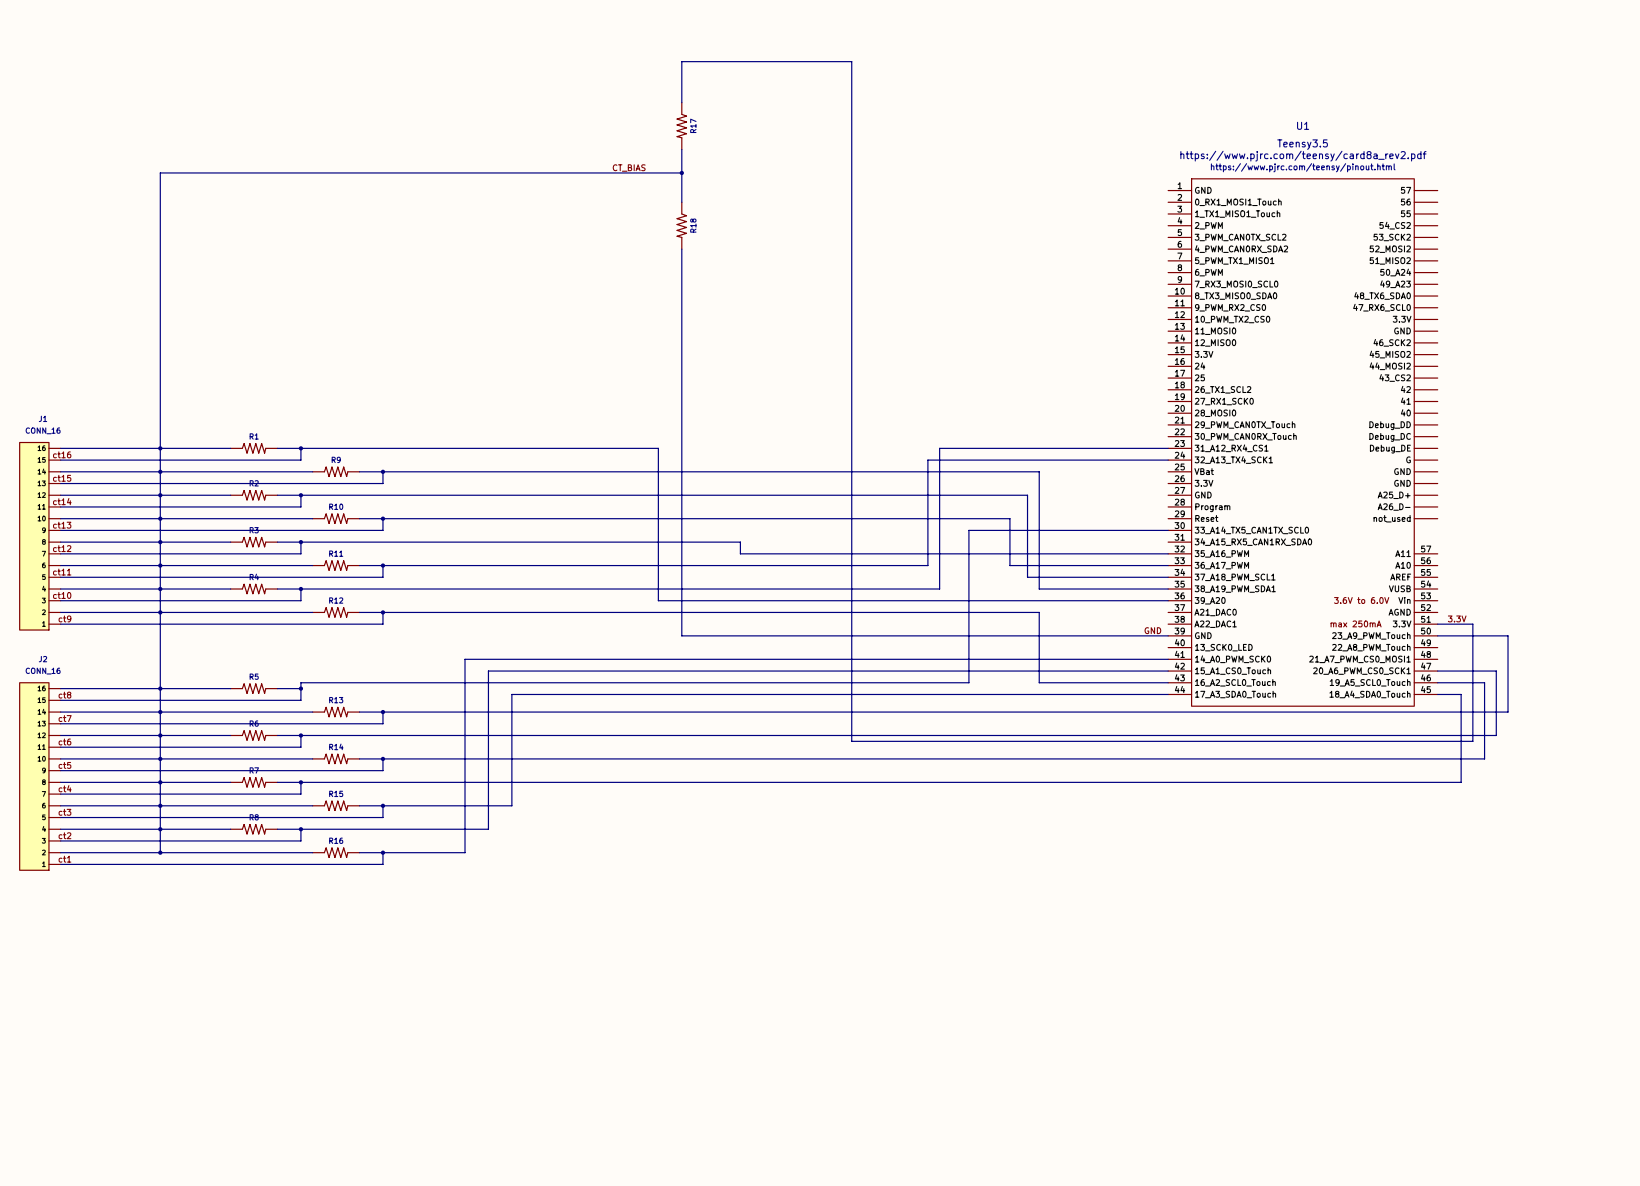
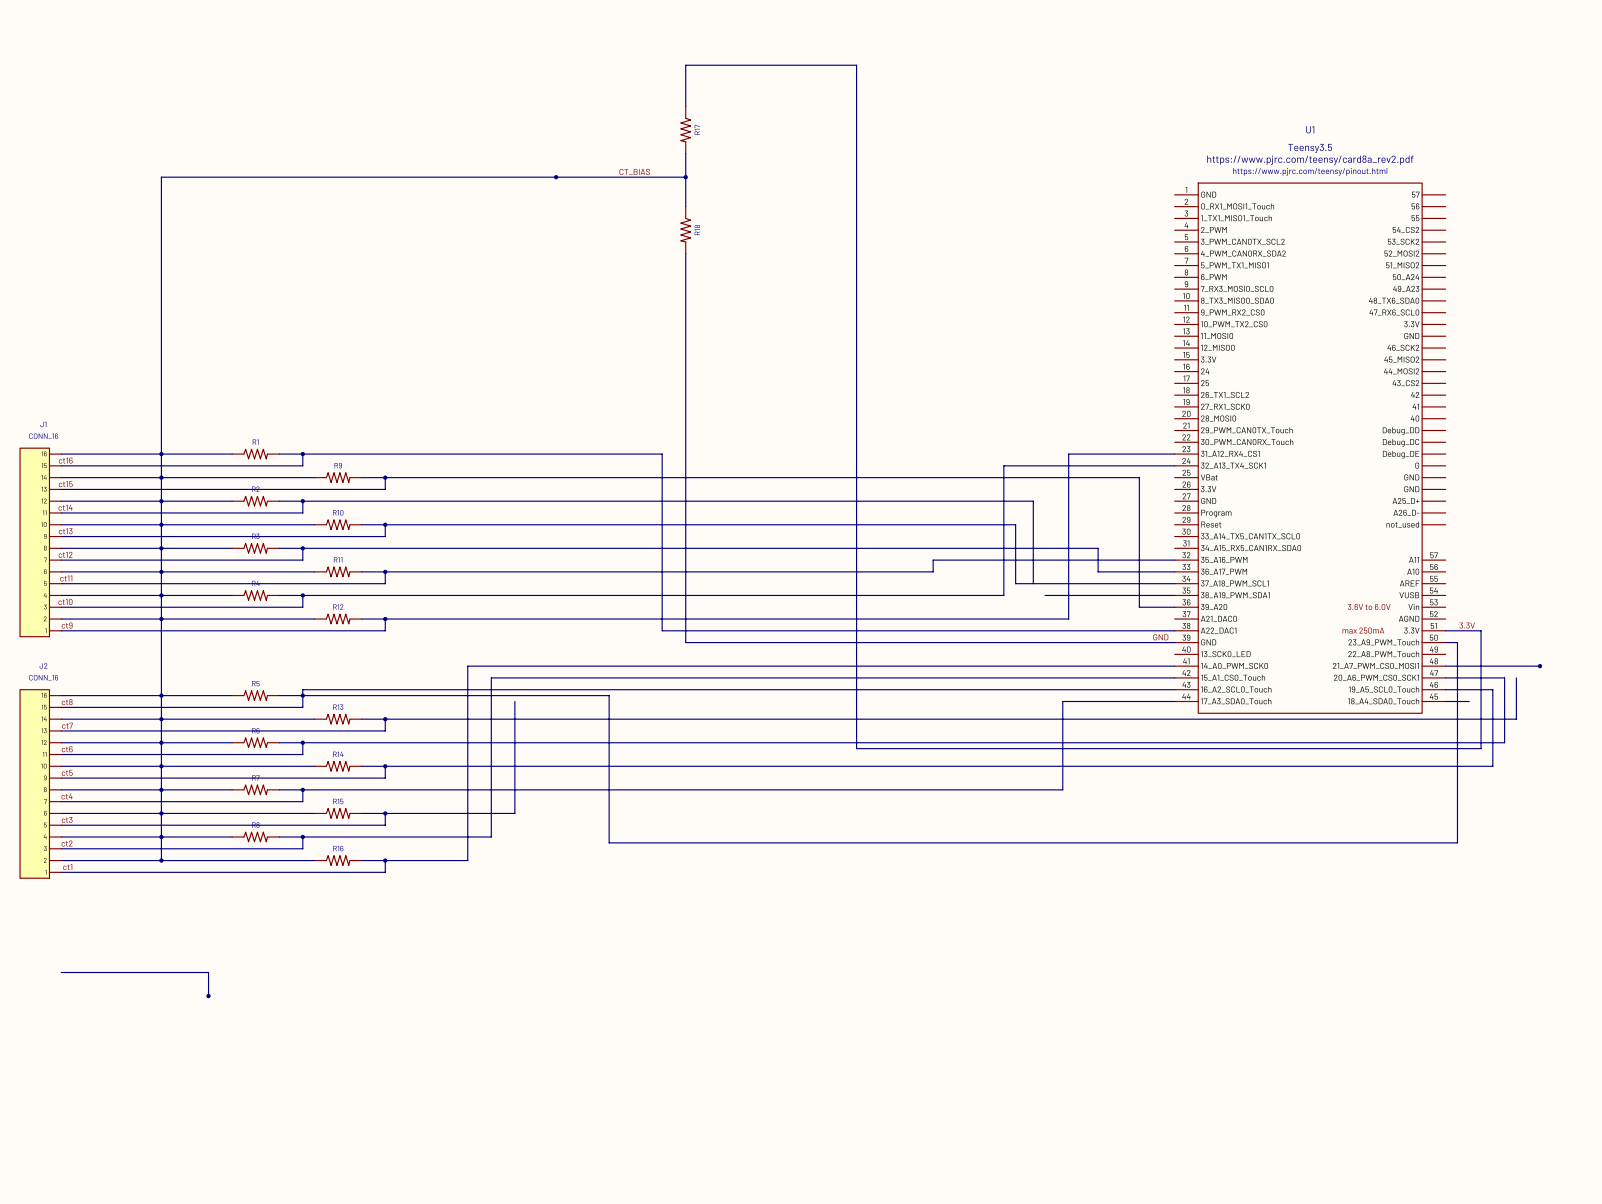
junction: none -> (556, 177)
wire: (1062, 448) (939, 448) (939, 589) -> (1003, 465) (1003, 595) (944, 595)
wire: none -> (1068, 454) (1068, 619) (1045, 619)
wire: (998, 460) (927, 460) (927, 553) (740, 553) (740, 542) -> (1098, 571) (1098, 548) (744, 548)
wire: (1039, 471) (1039, 589) -> (1045, 477) (1139, 477) (1139, 607)
wire: (1168, 530) (968, 530) (968, 682) -> none
wire: (1009, 565) (1091, 565) -> (1015, 571) (1015, 583) (1033, 583)
wire: (658, 600) (1132, 600) -> (662, 607) (662, 630) (1174, 630)
wire: (1039, 612) (1039, 682) -> (974, 689) (1045, 689)
wire: (1449, 635) (1508, 635) (1508, 671) -> (1457, 642) (1457, 842) (609, 842) (609, 695) (302, 695)
wire: none -> (1445, 666) (1539, 666)
junction: none -> (1539, 666)
wire: (511, 694) (1056, 694) -> none
wire: (1461, 694) (1461, 782) (1056, 782) -> (1062, 701) (1062, 789)
wire: none -> (61, 972) (208, 972) (208, 996)
junction: none -> (208, 996)

